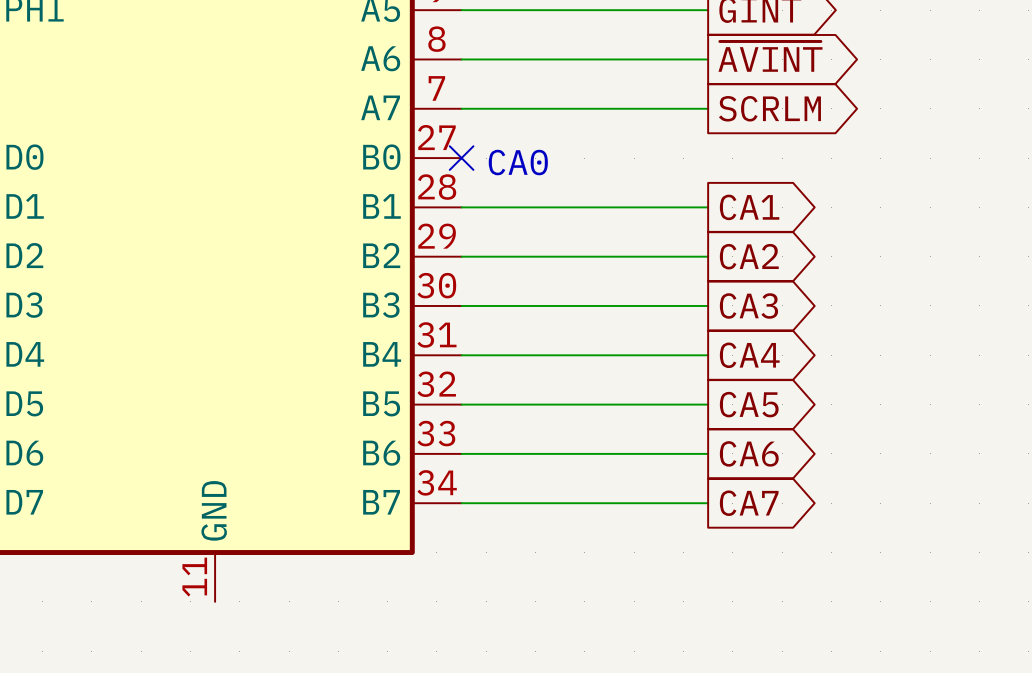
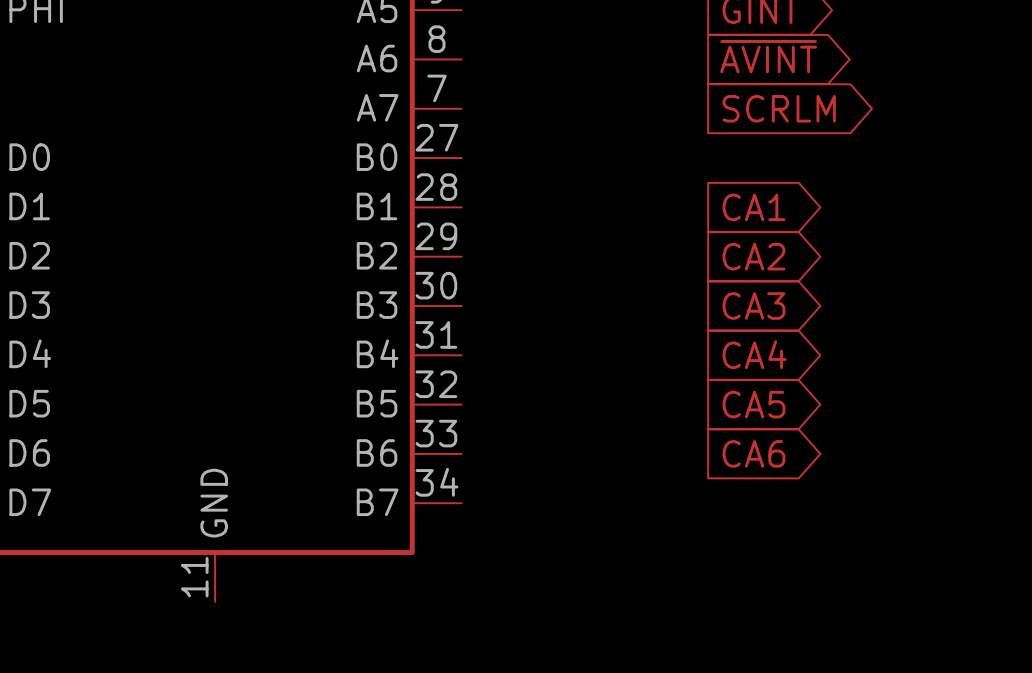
wire: (461, 10) (708, 10) -> none
wire: (461, 59) (708, 59) -> none
wire: (461, 108) (708, 108) -> none
no-connect mark: (461, 158) -> none
text: CA0 (518, 162) -> none
wire: (461, 207) (708, 207) -> none
wire: (461, 256) (708, 256) -> none
wire: (461, 305) (708, 305) -> none
wire: (461, 355) (708, 355) -> none
wire: (461, 404) (708, 404) -> none
wire: (461, 453) (708, 453) -> none
wire: (461, 503) (708, 503) -> none
global label: CA7 (749, 503) -> none

